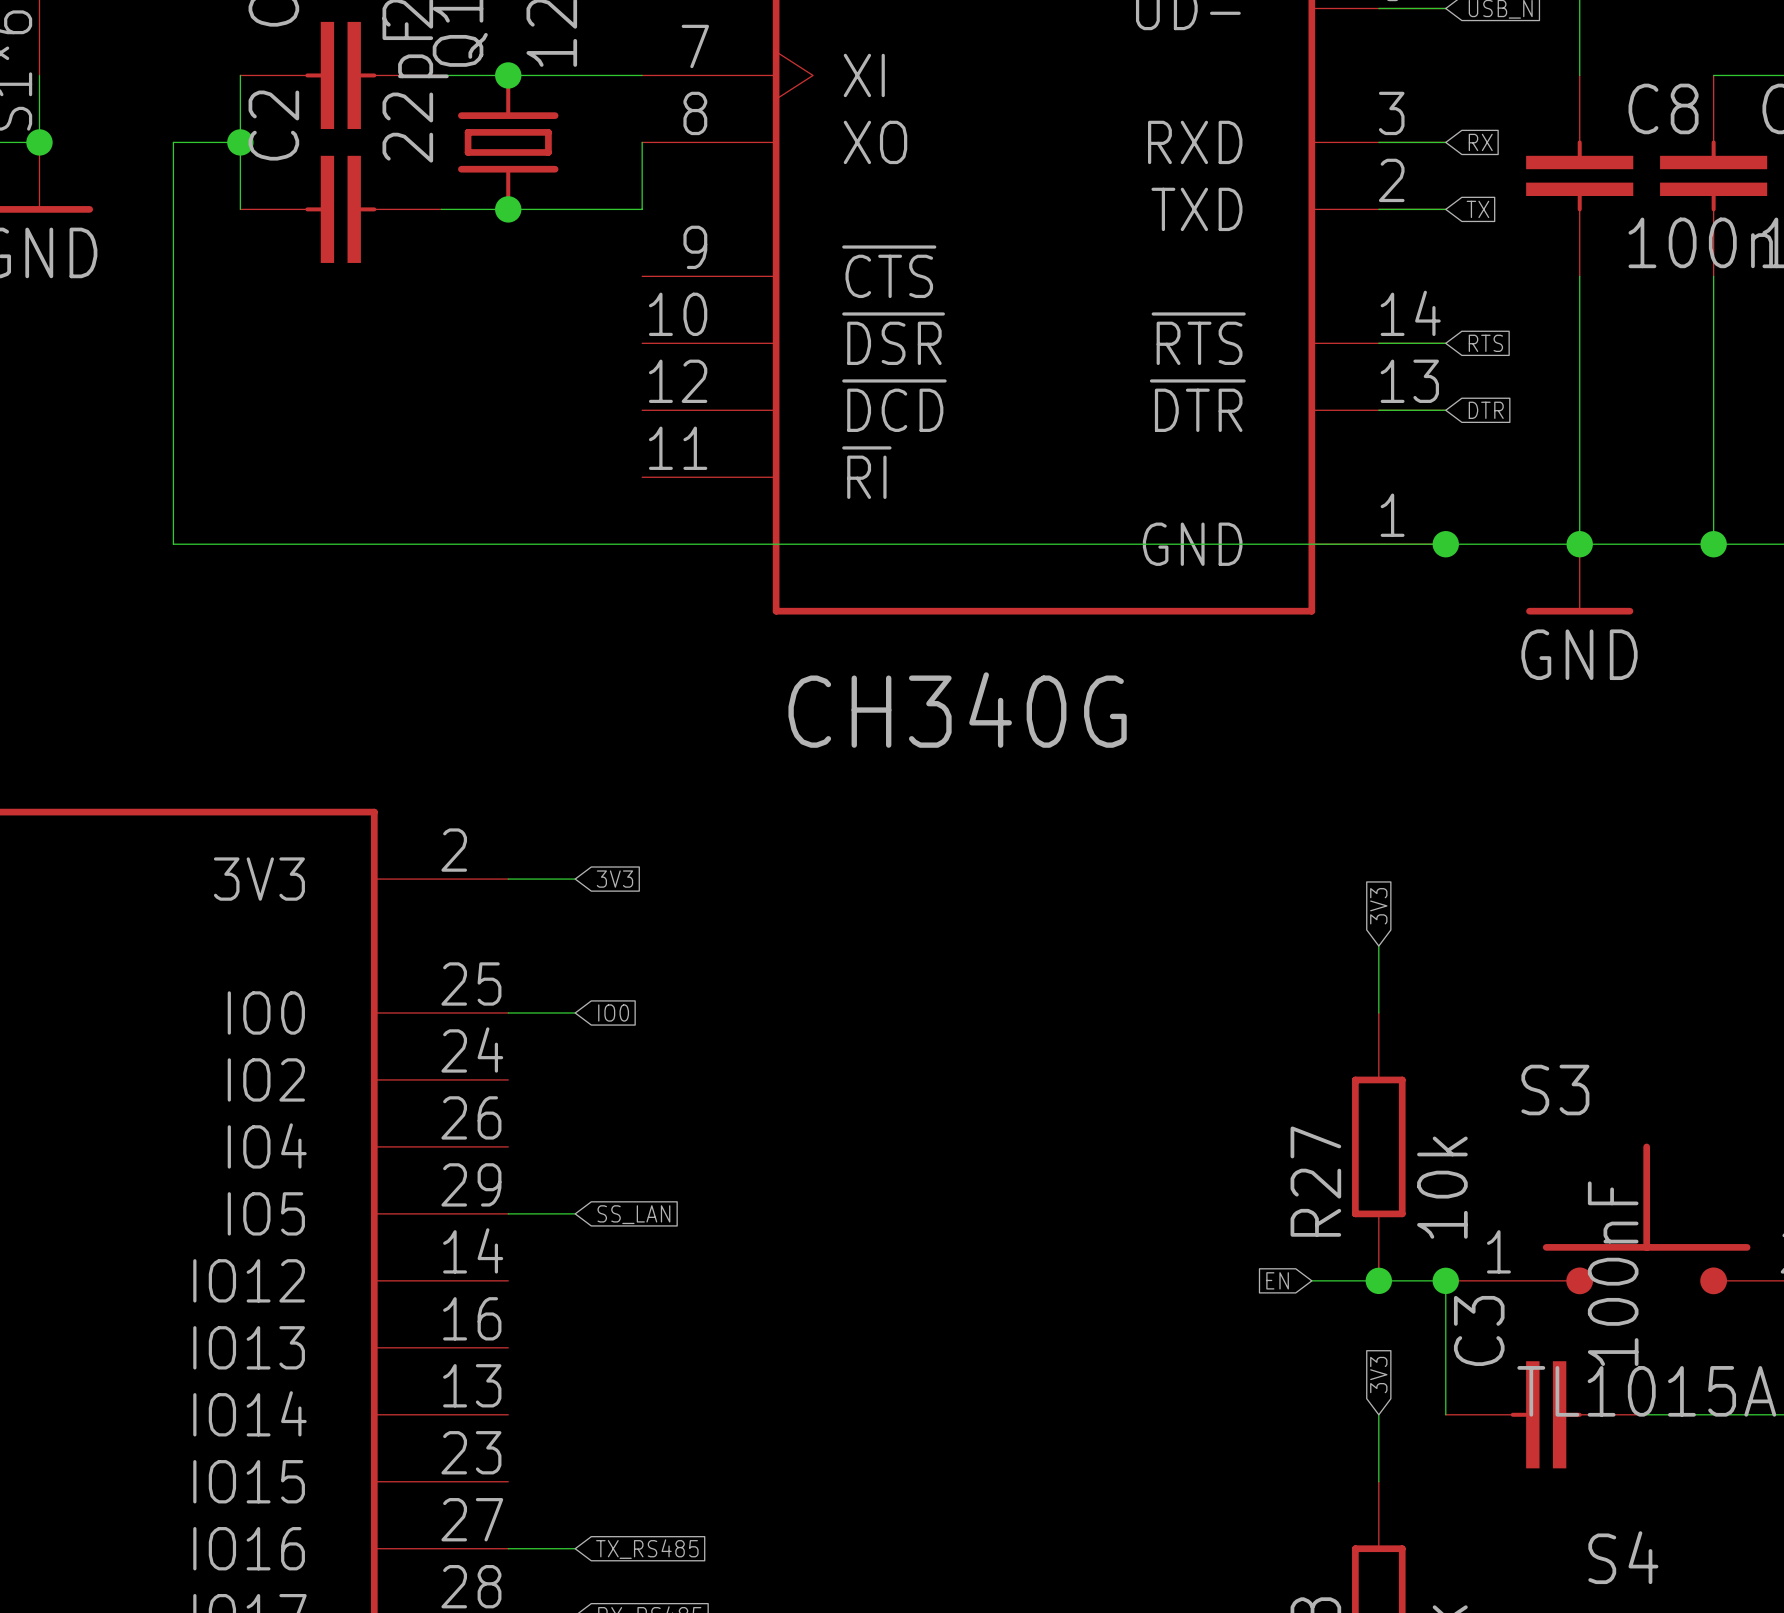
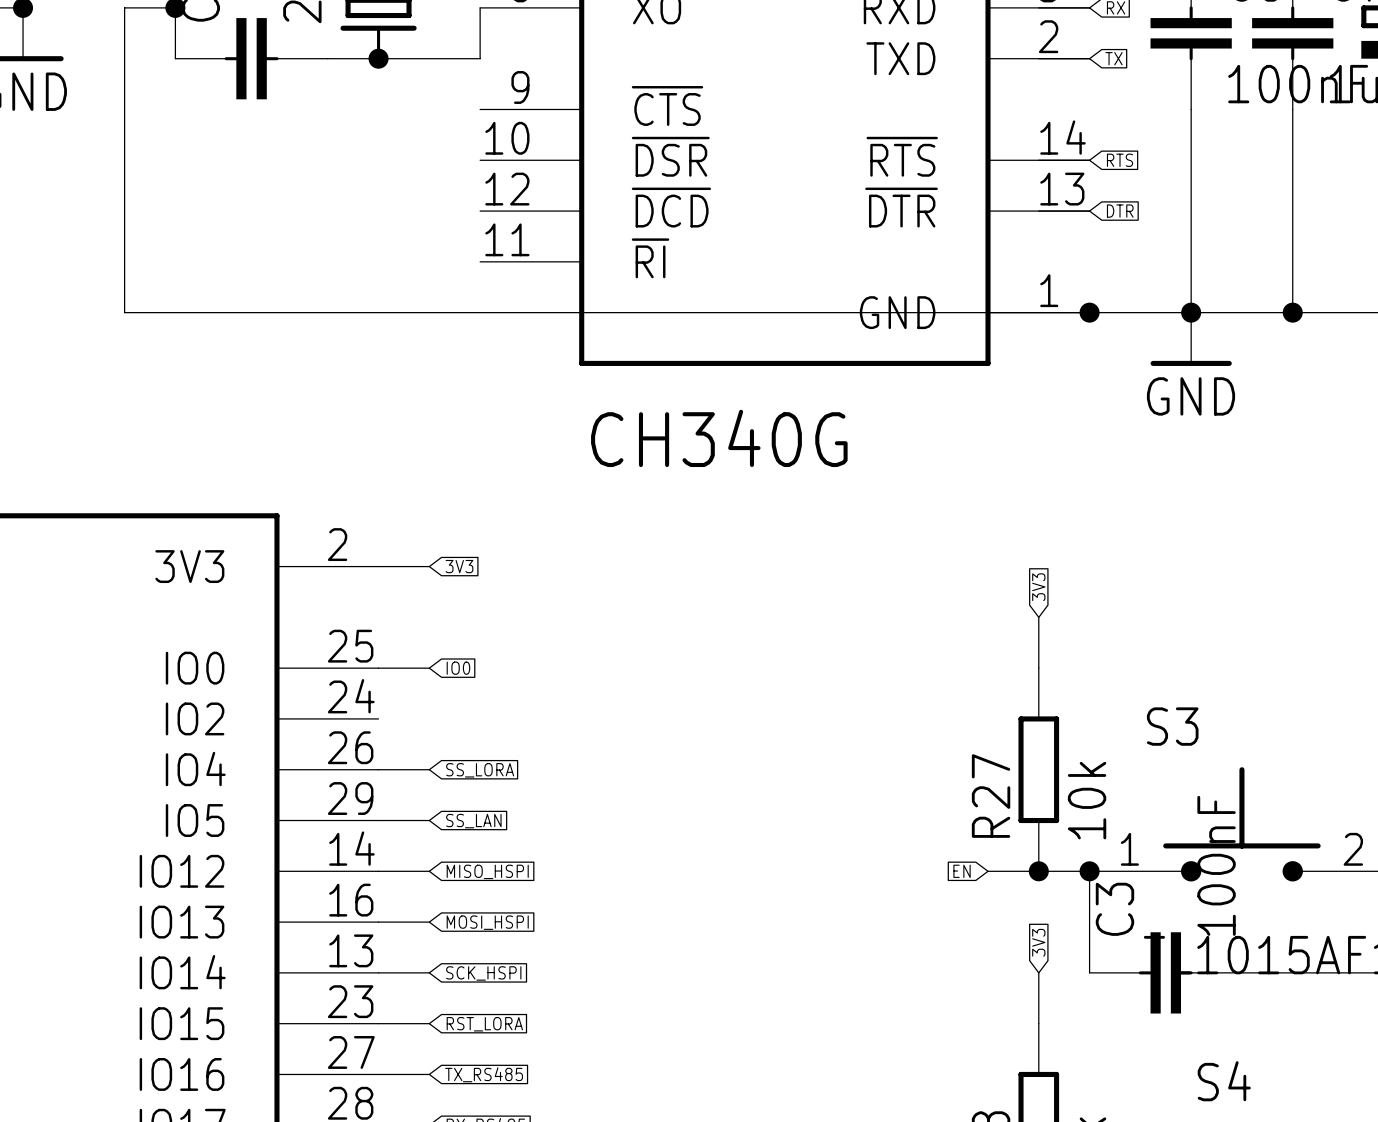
wire: none -> (378, 769) (429, 769)
global label: none -> SS_LORA (480, 770)
wire: none -> (378, 871) (429, 871)
global label: none -> MISO_HSPI (487, 871)
wire: none -> (378, 922) (429, 922)
global label: none -> MOSI_HSPI (487, 922)
wire: none -> (378, 972) (429, 972)
global label: none -> SCK_HSPI (483, 973)
wire: none -> (378, 1023) (429, 1023)
global label: none -> RST_LORA (484, 1024)

